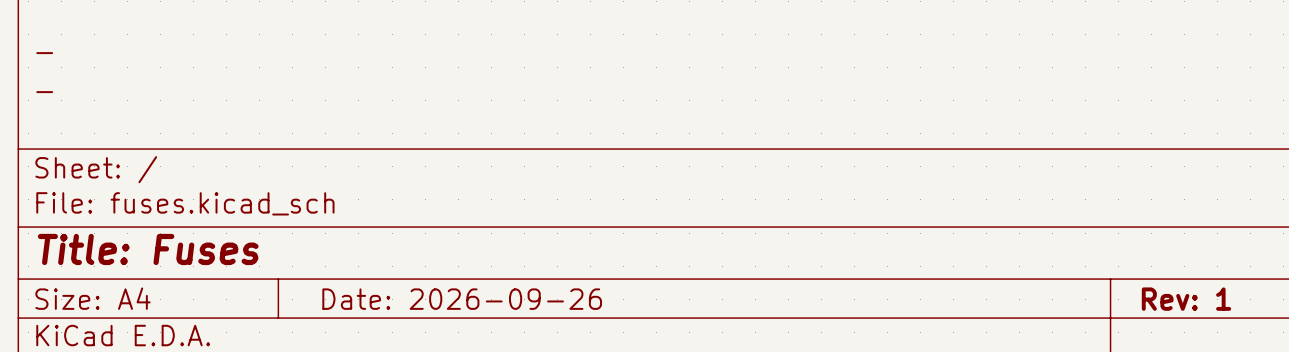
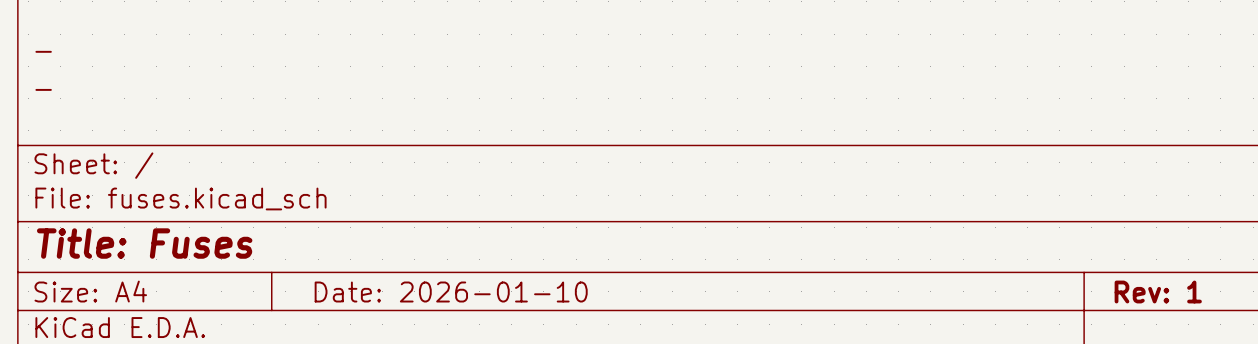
title block: Date: 2026-09-26 (462, 299) -> Date: 2026-01-10 (451, 292)

